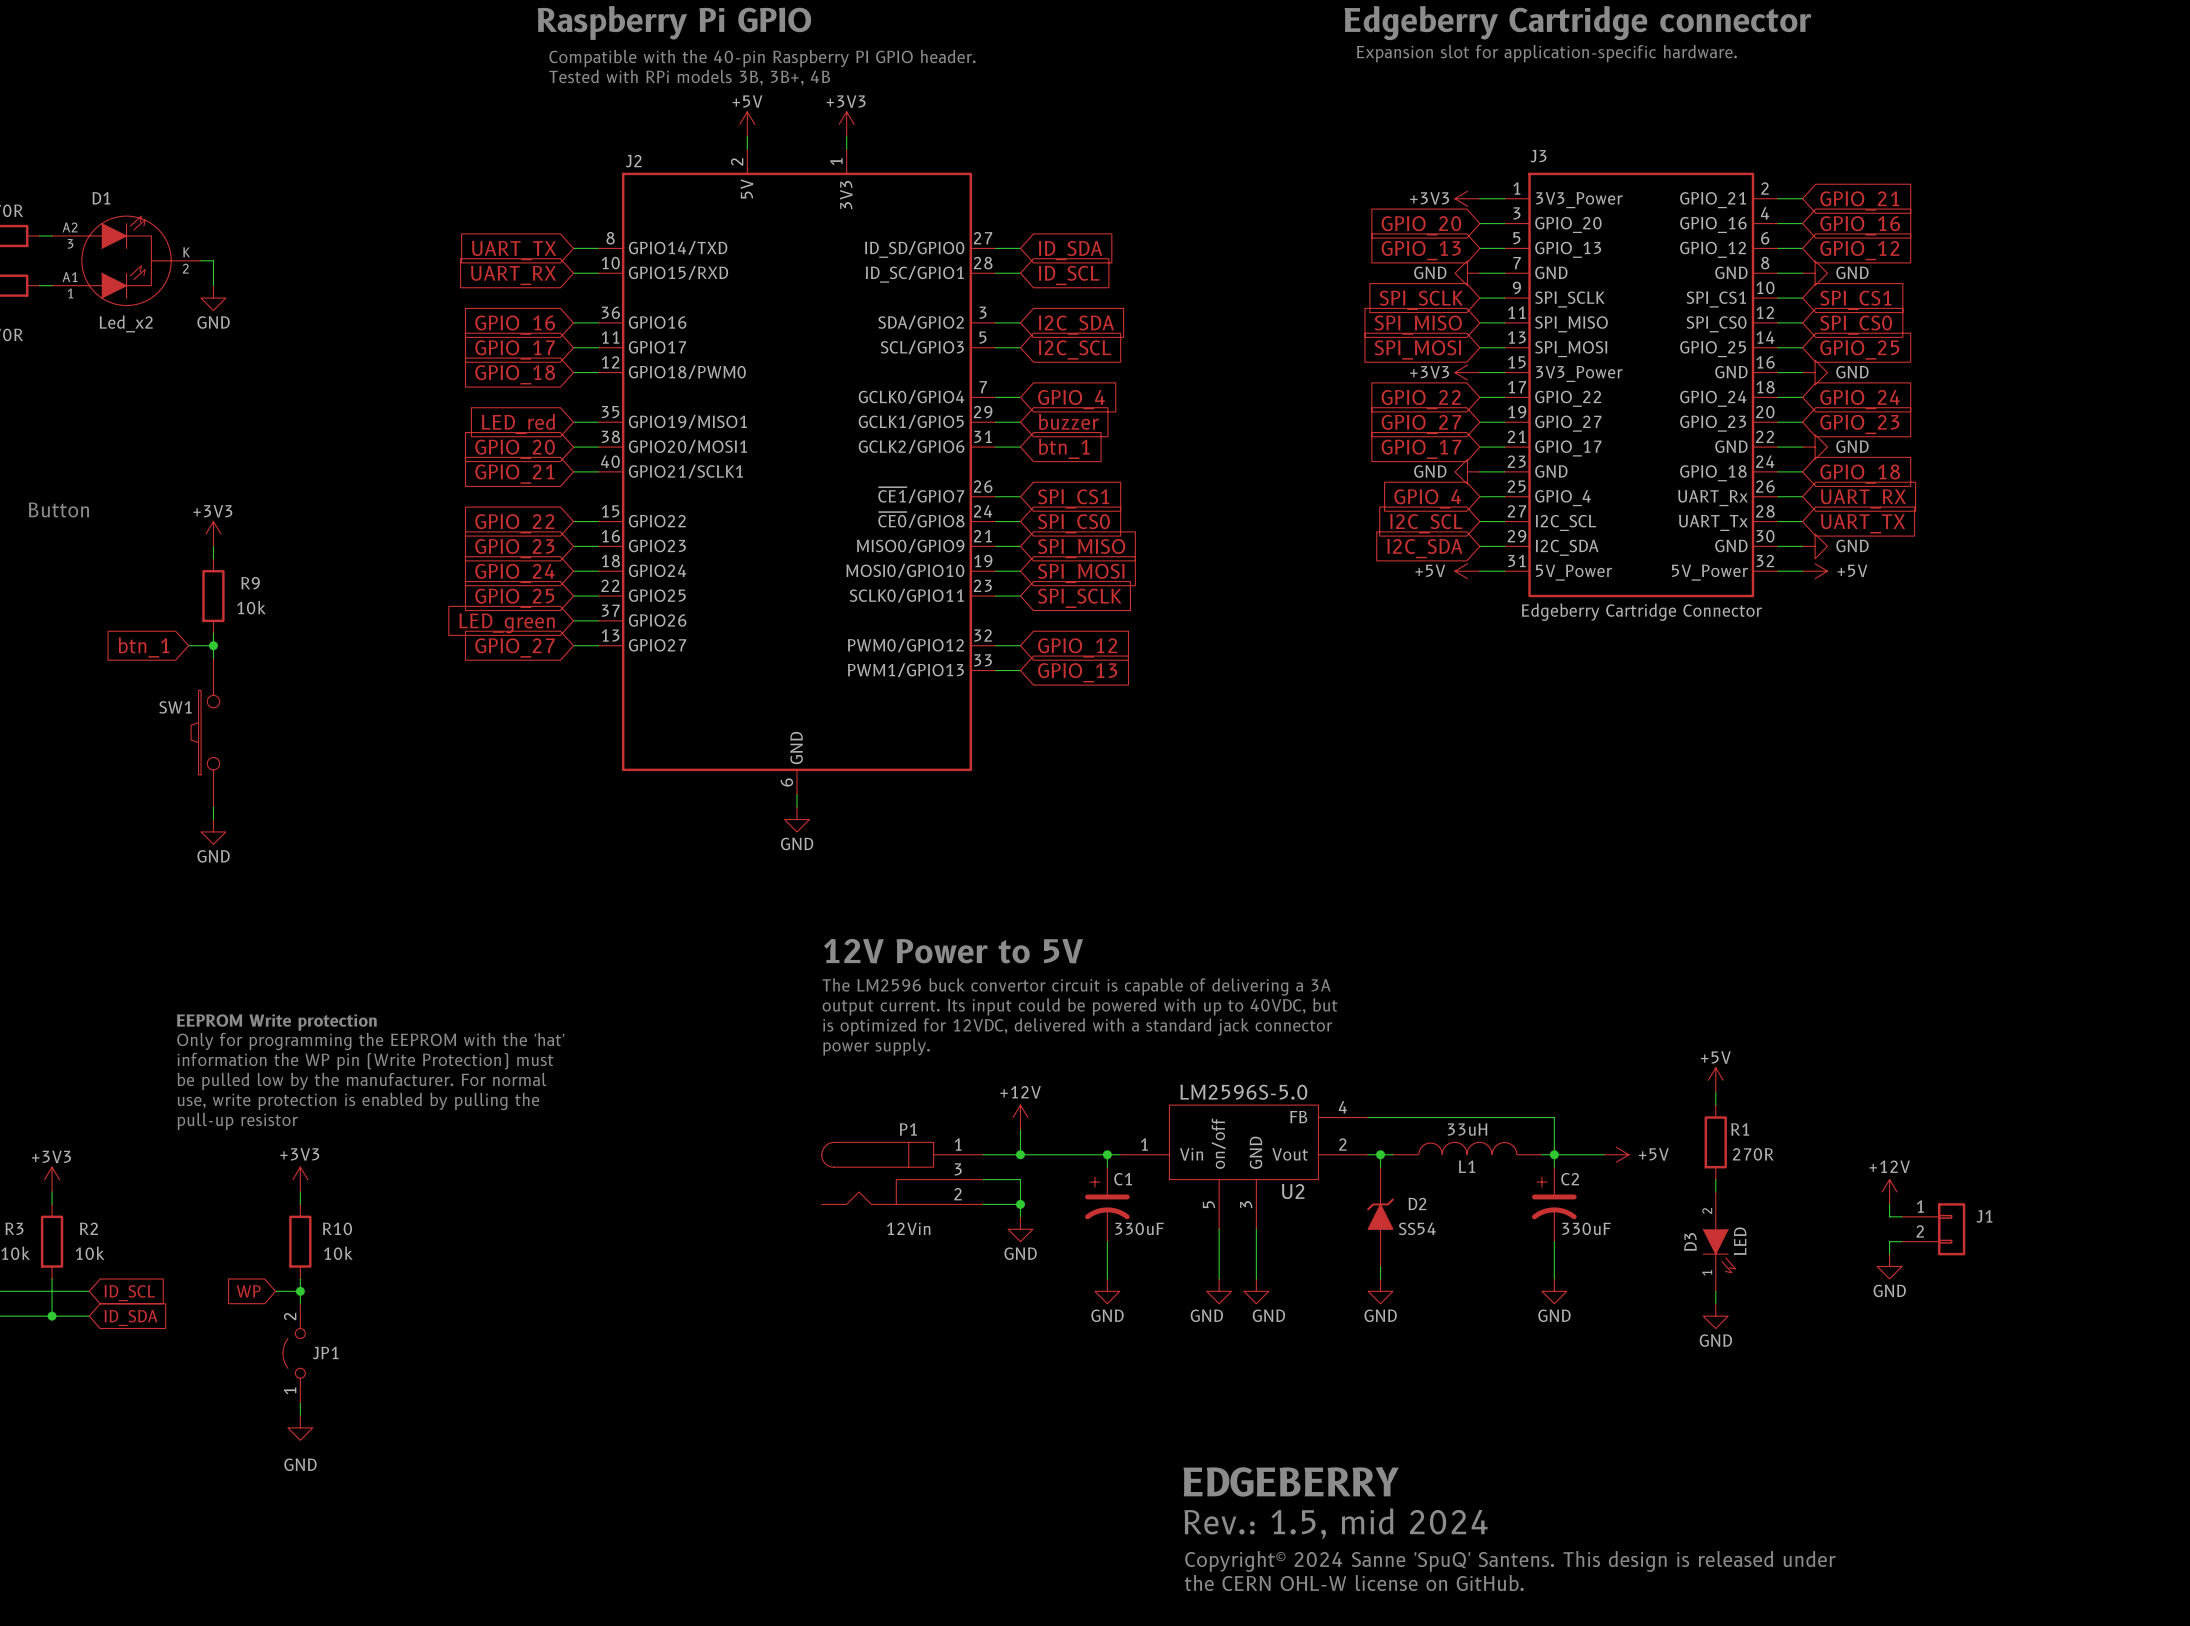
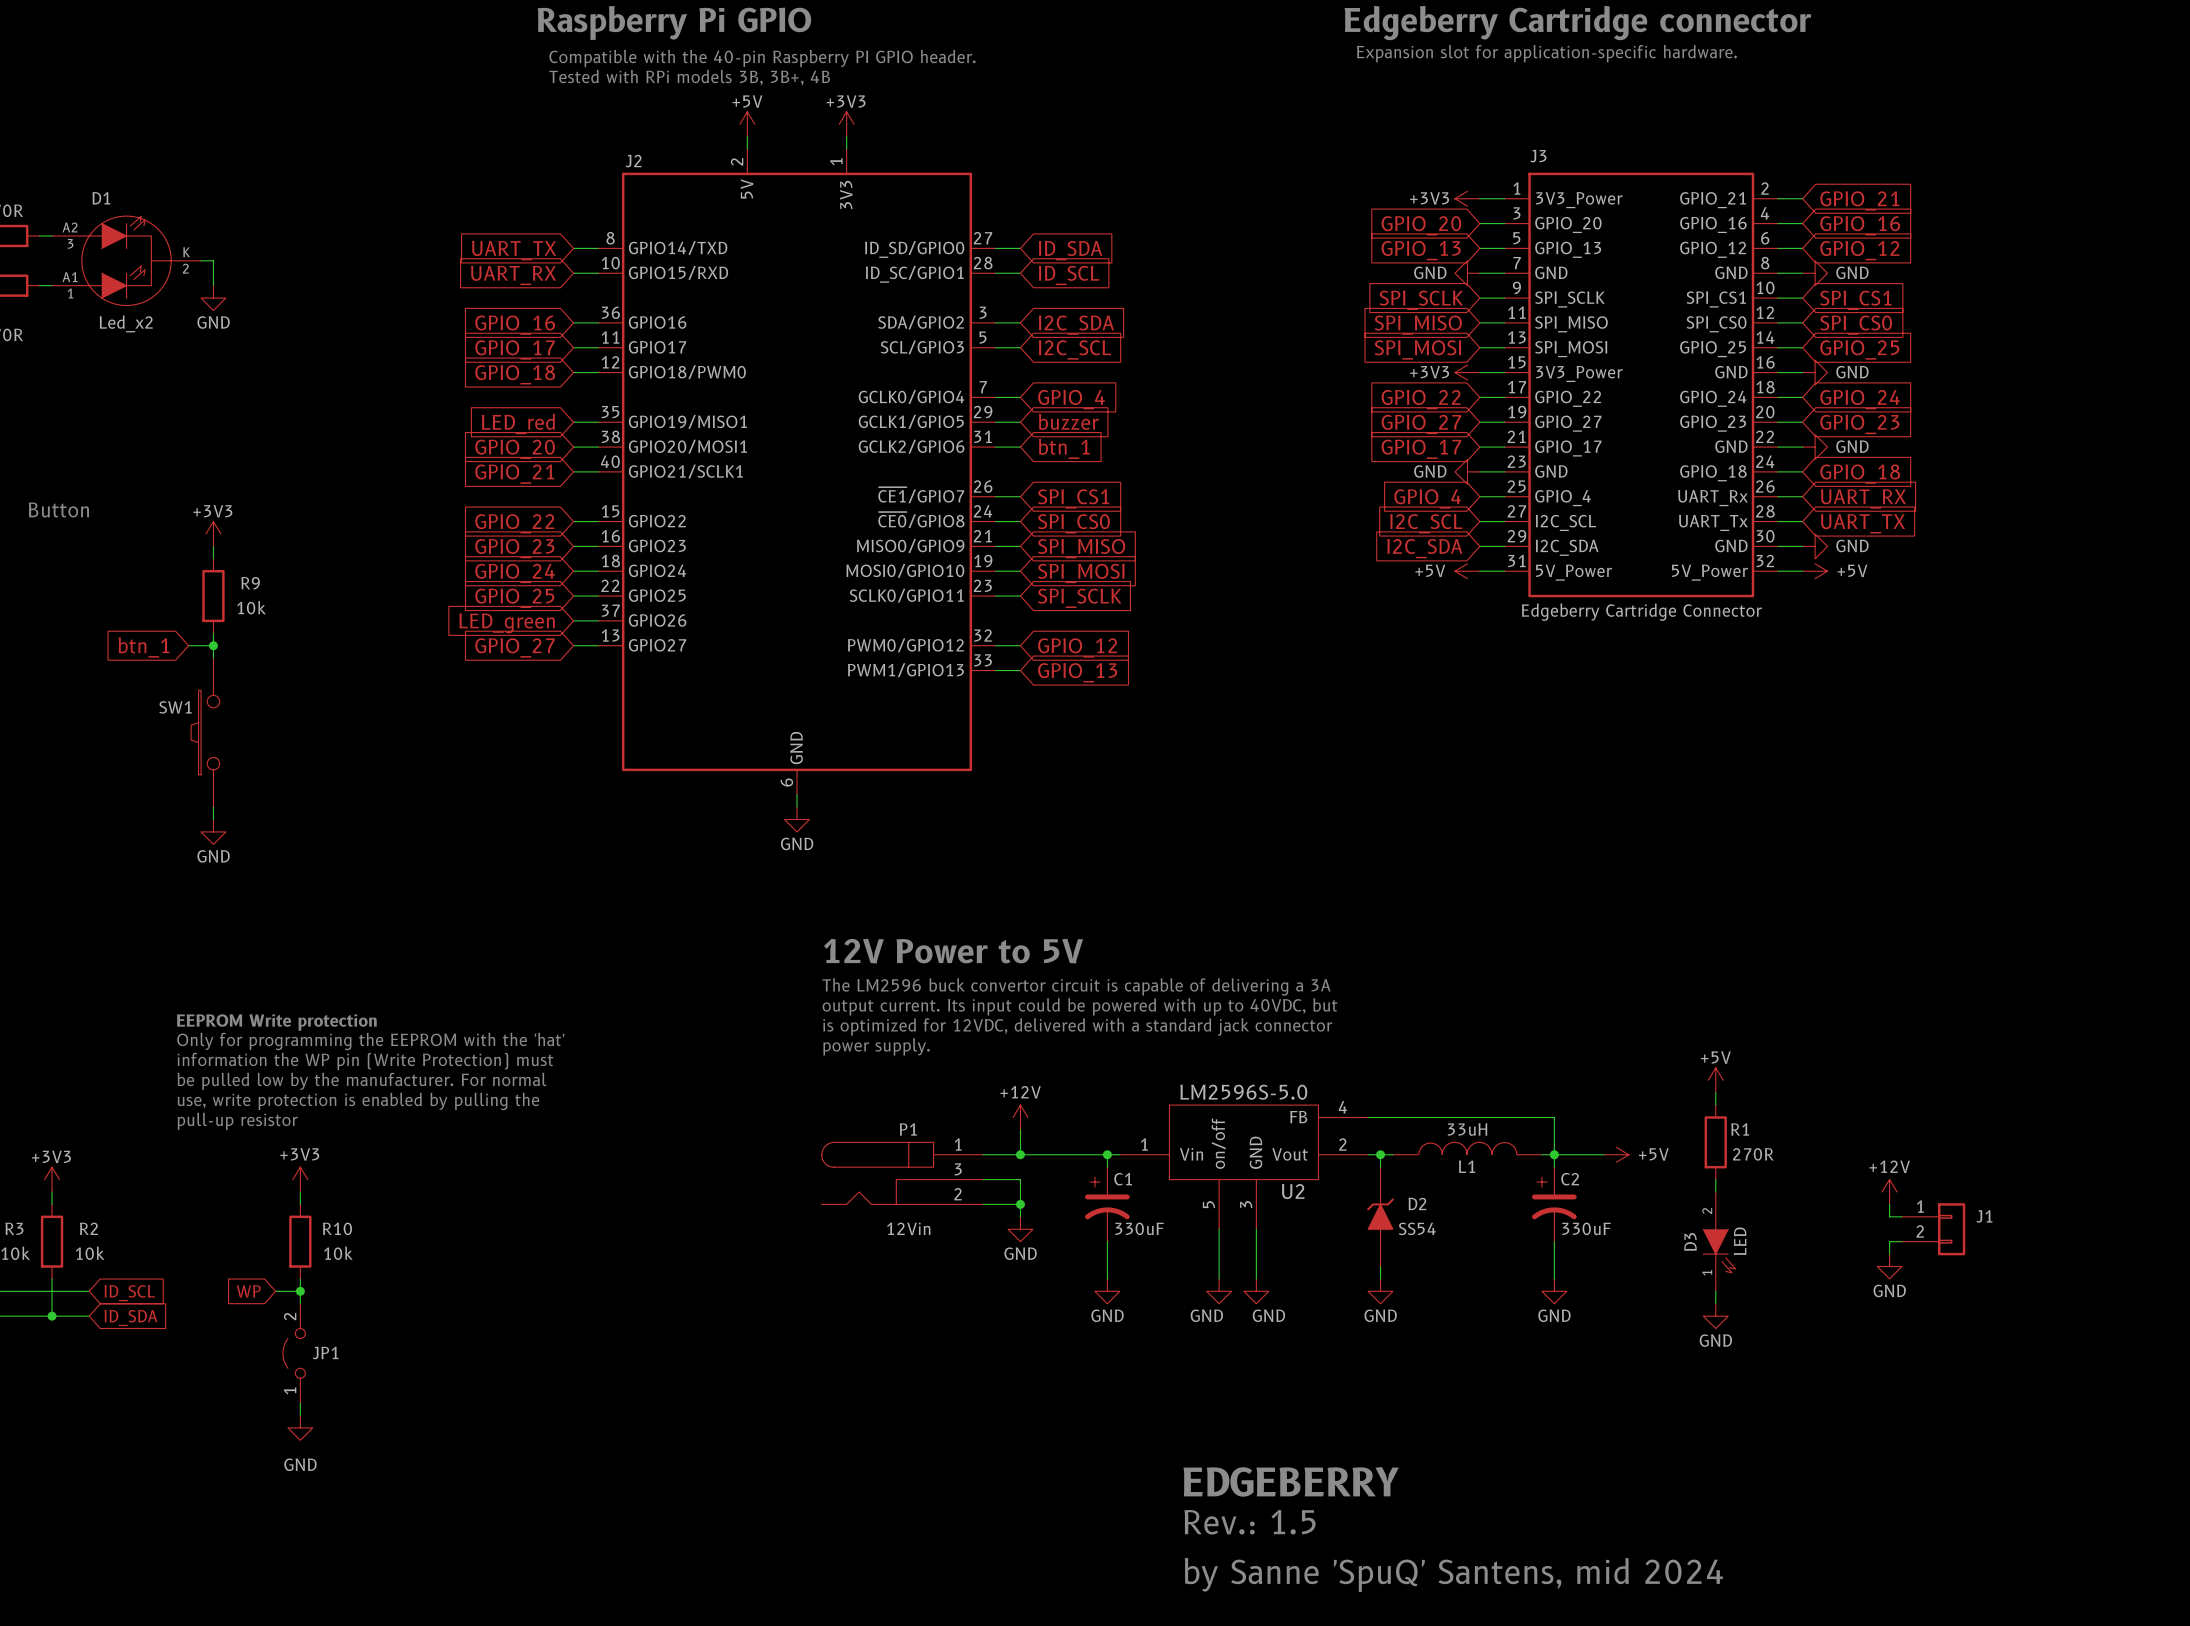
text: Rev.: 1.5, mid 2024 (1336, 1523) -> Rev.: 1.5 (1249, 1522)
text: Copyright© 2024 Sanne 'SpuQ' Santens. This design is released under (1510, 1561) -> none
text: the CERN OHL-W license on GitHub. (1354, 1583) -> by Sanne 'SpuQ' Santens, mid 2024 (1453, 1574)

